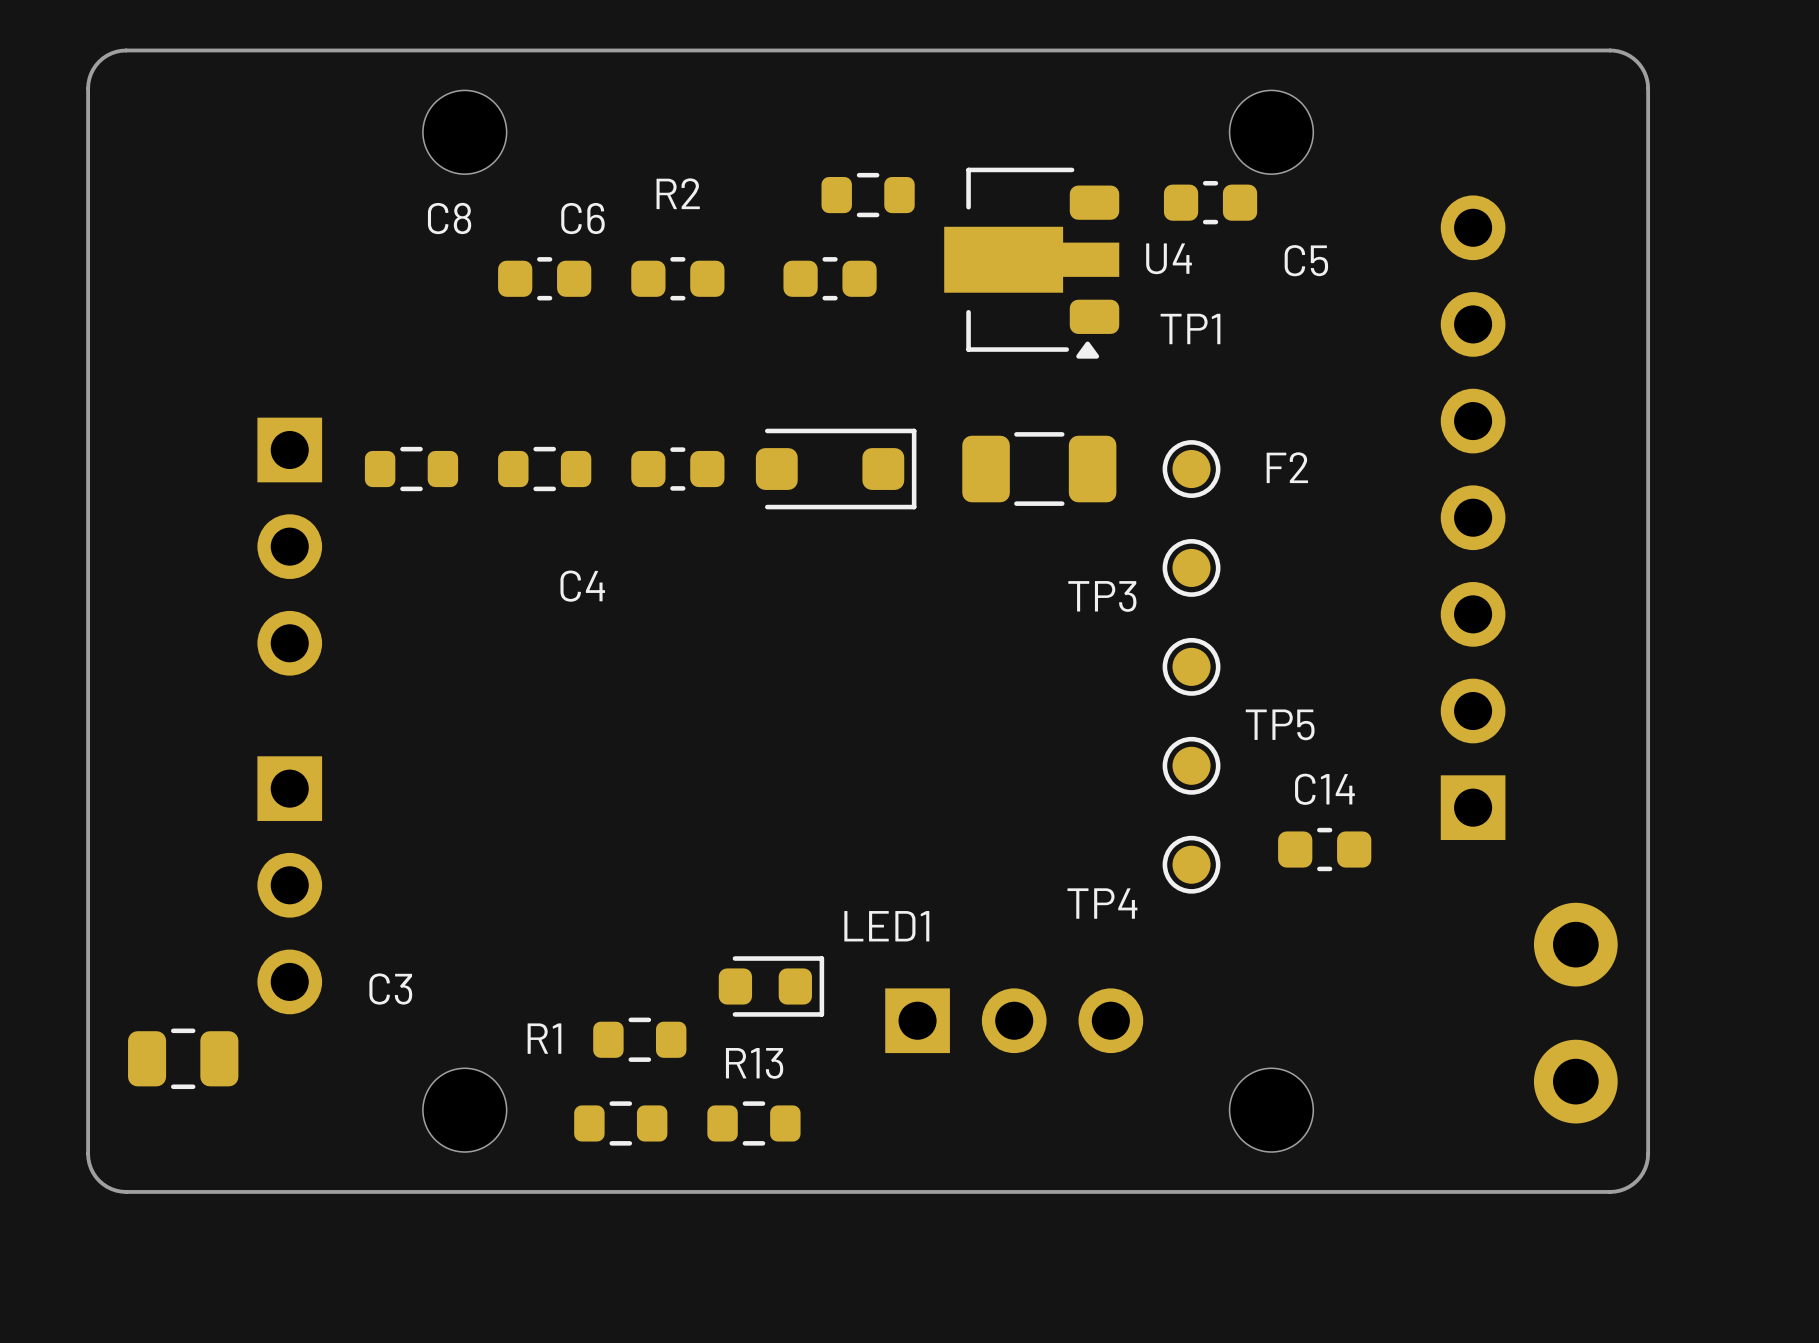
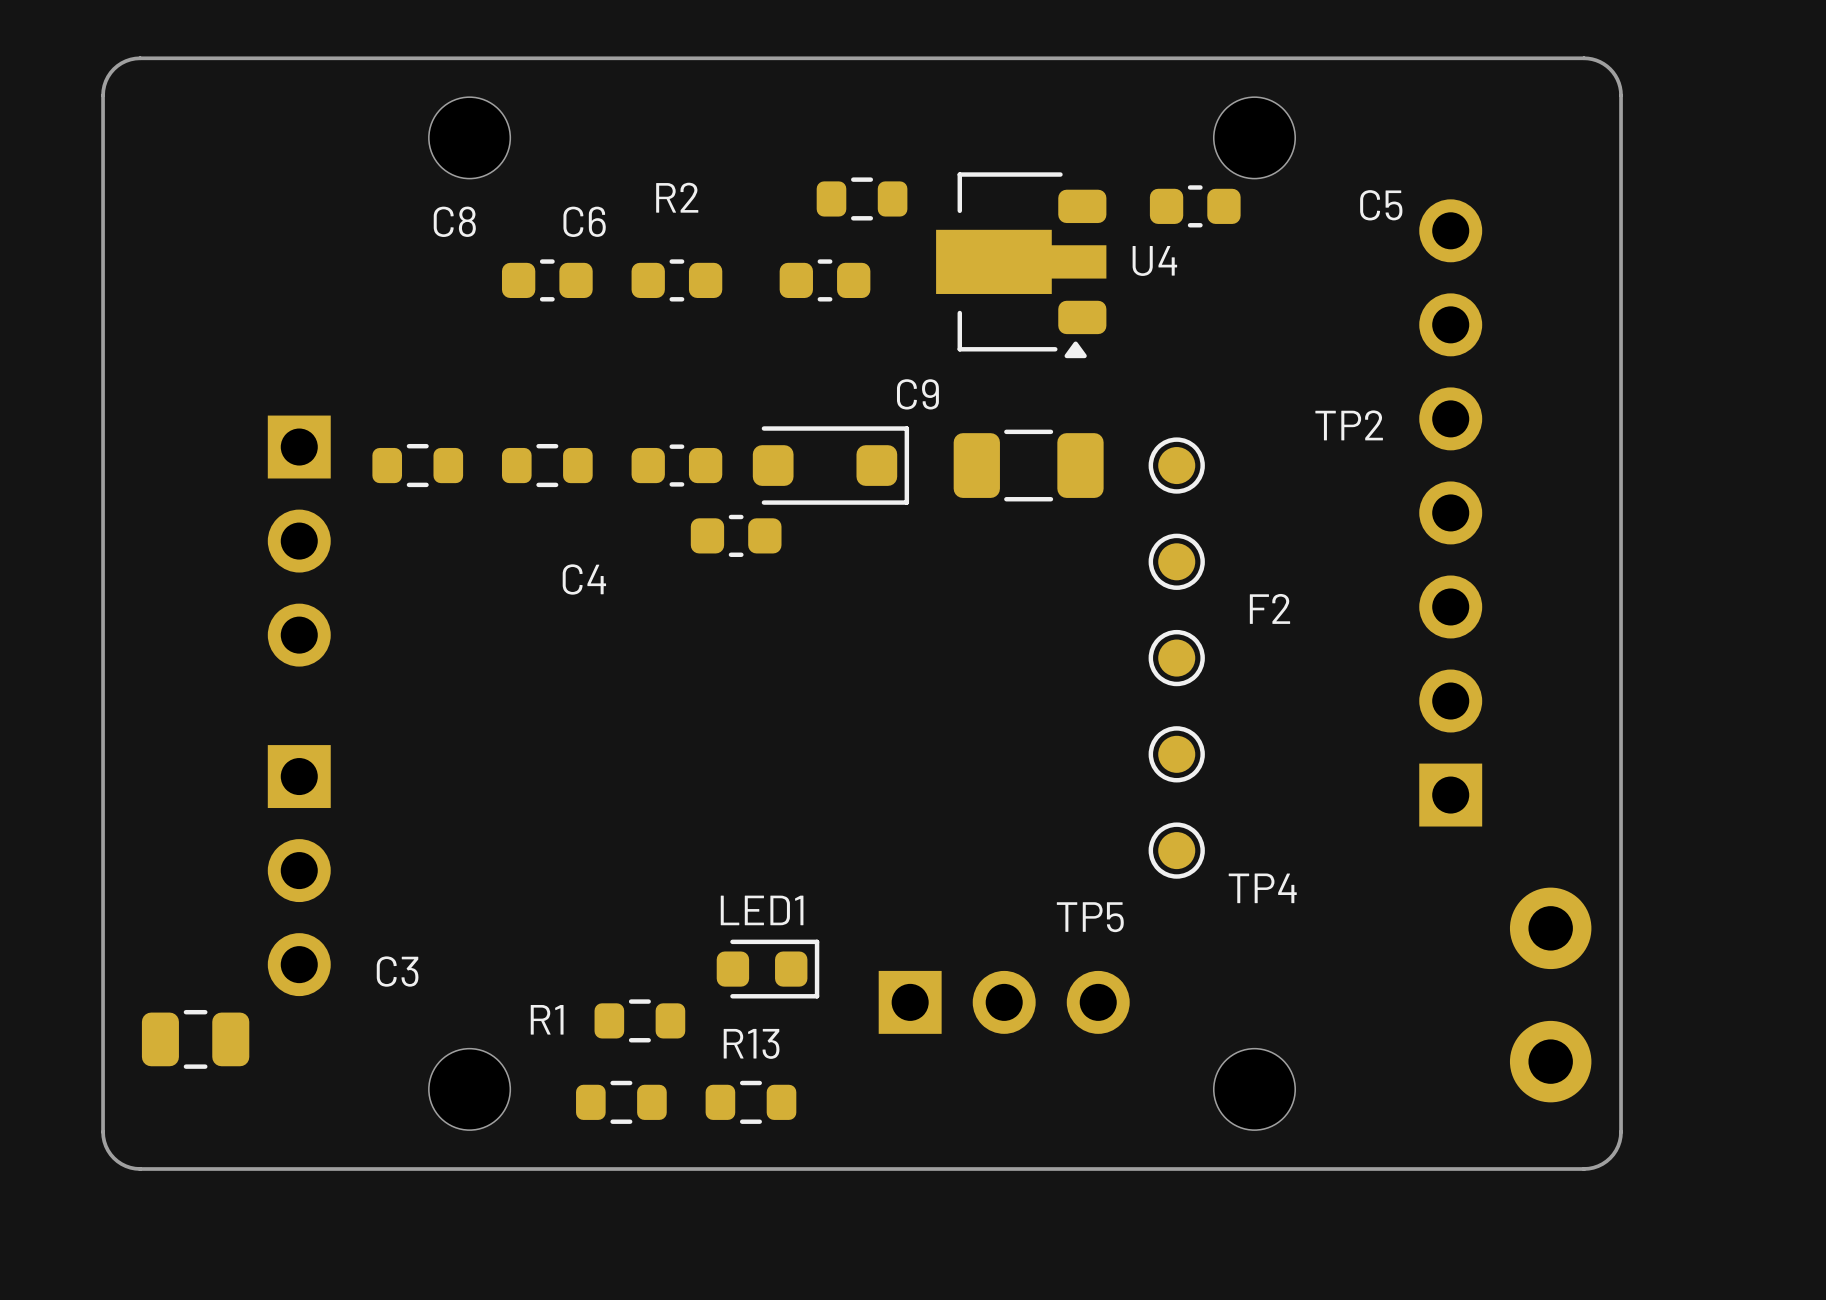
C5 name position: C5 (1306, 260) -> C5 (1381, 205)
TP1 name: TP1 (1190, 328) -> none
C9 name: none -> C9 (917, 394)
TP2 name: none -> TP2 (1349, 425)
F2 name position: F2 (1287, 467) -> F2 (1269, 608)
part: none -> (736, 535)
TP3 name: TP3 (1102, 596) -> none
TP5 name position: TP5 (1280, 724) -> TP5 (1090, 917)
C14: (1324, 849) -> none
TP4 name position: TP4 (1102, 903) -> TP4 (1262, 888)
LED1 name position: LED1 (886, 926) -> LED1 (762, 910)

